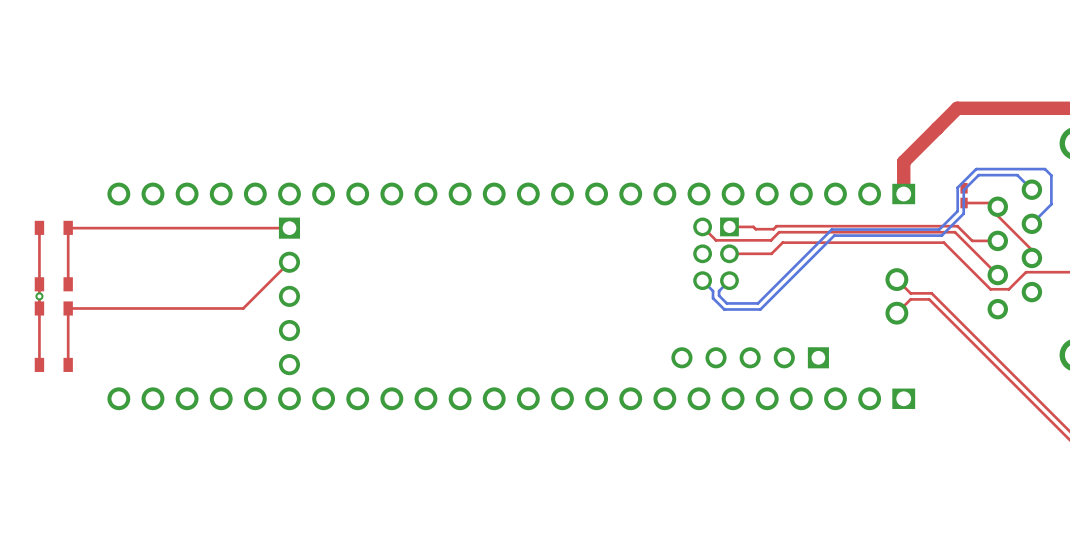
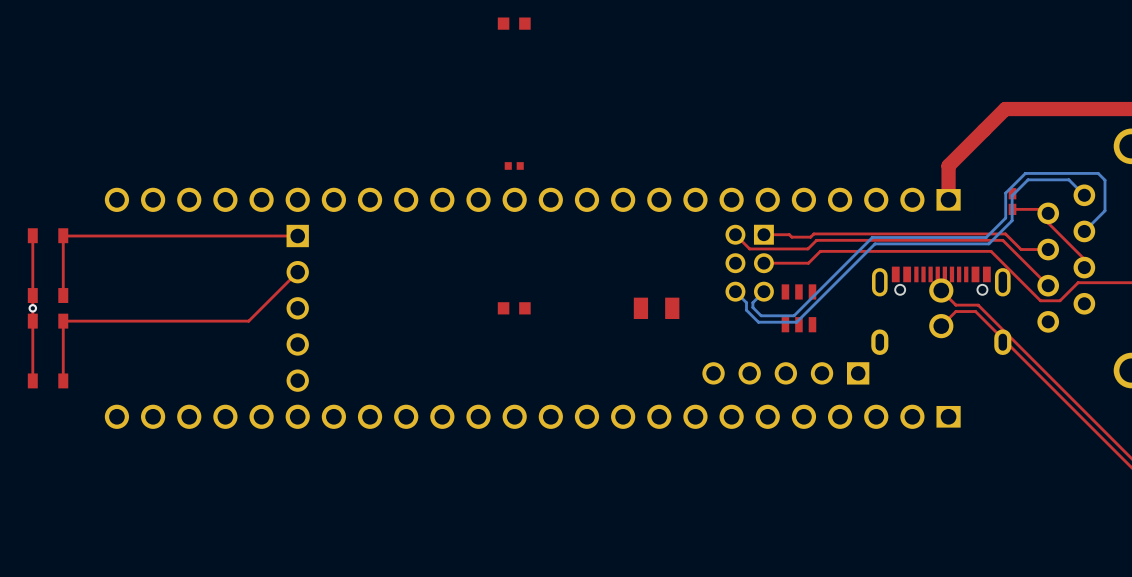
part: none -> (514, 23)
part: none -> (514, 165)
part: none -> (514, 308)
part: none -> (656, 308)
part: none -> (798, 308)
part: none -> (941, 310)

